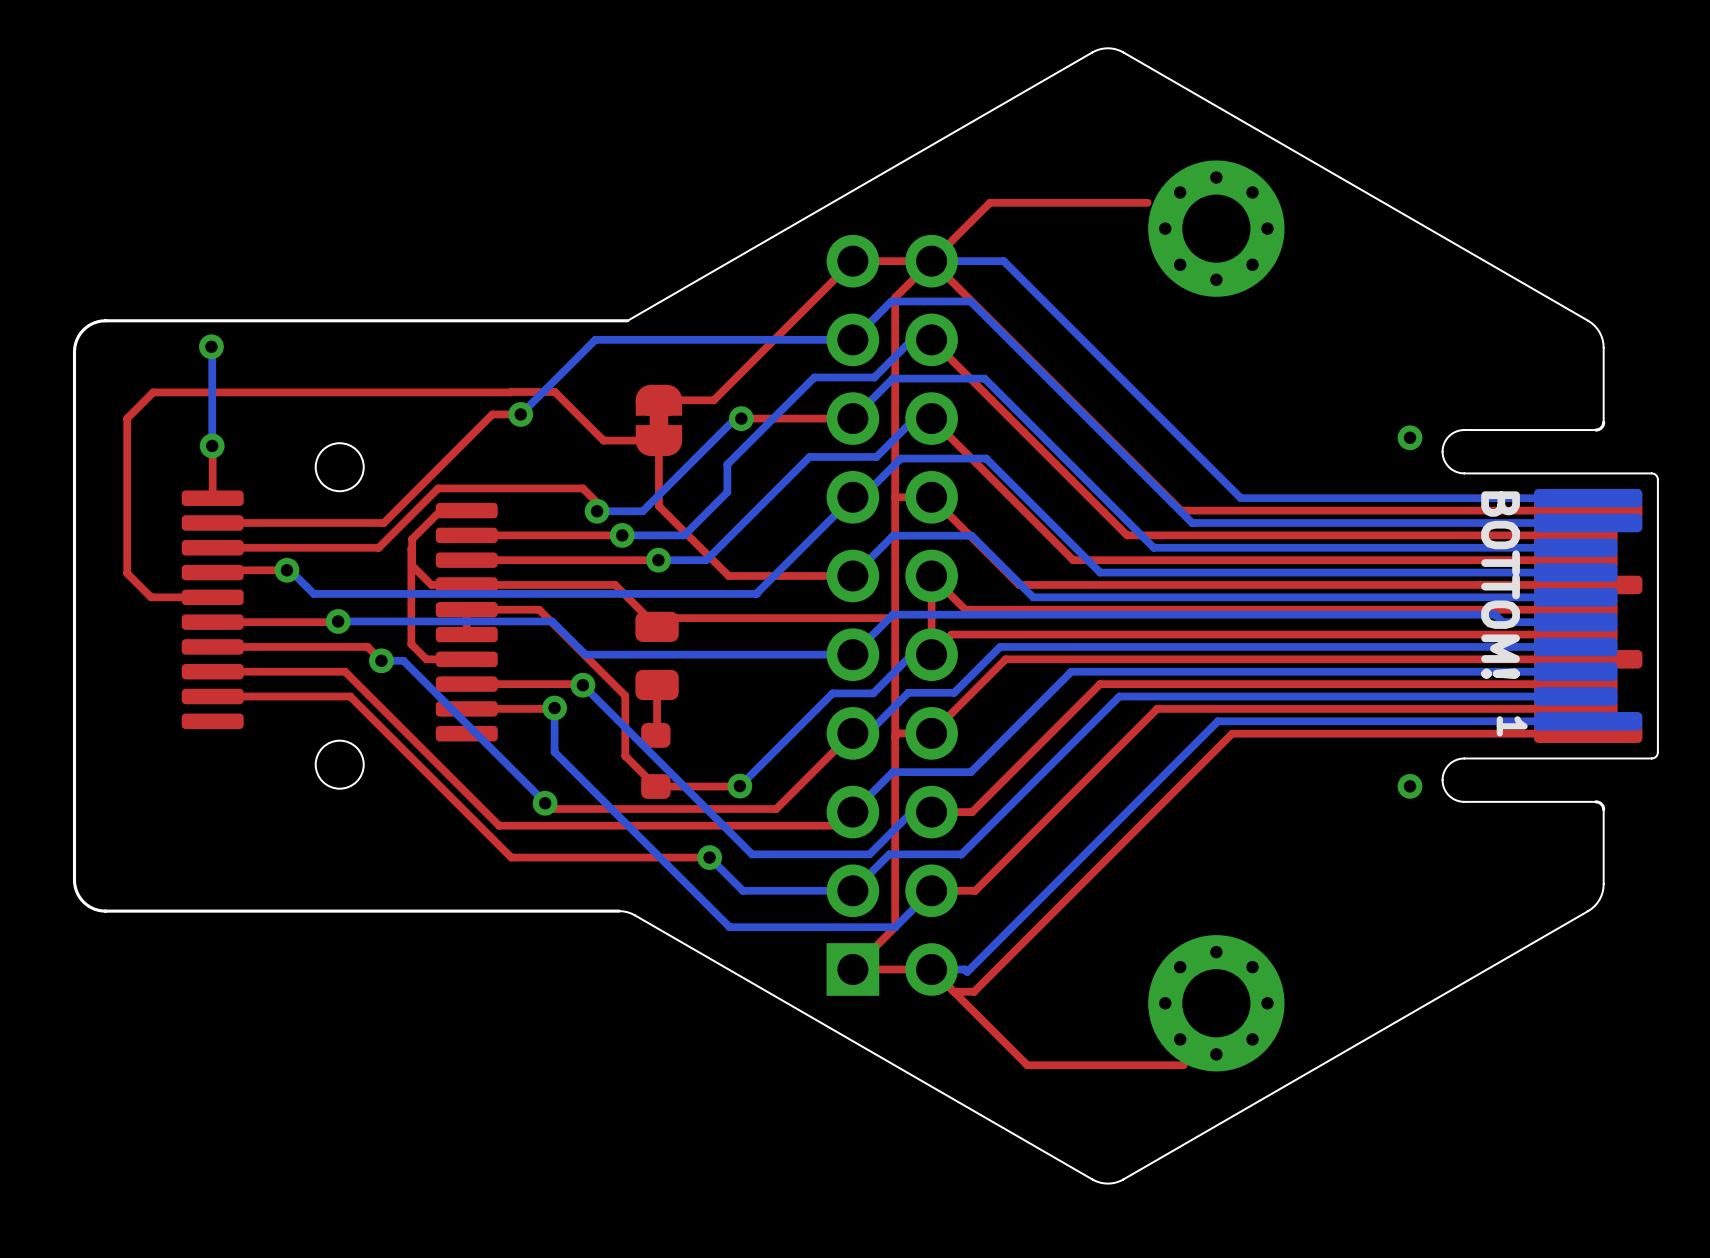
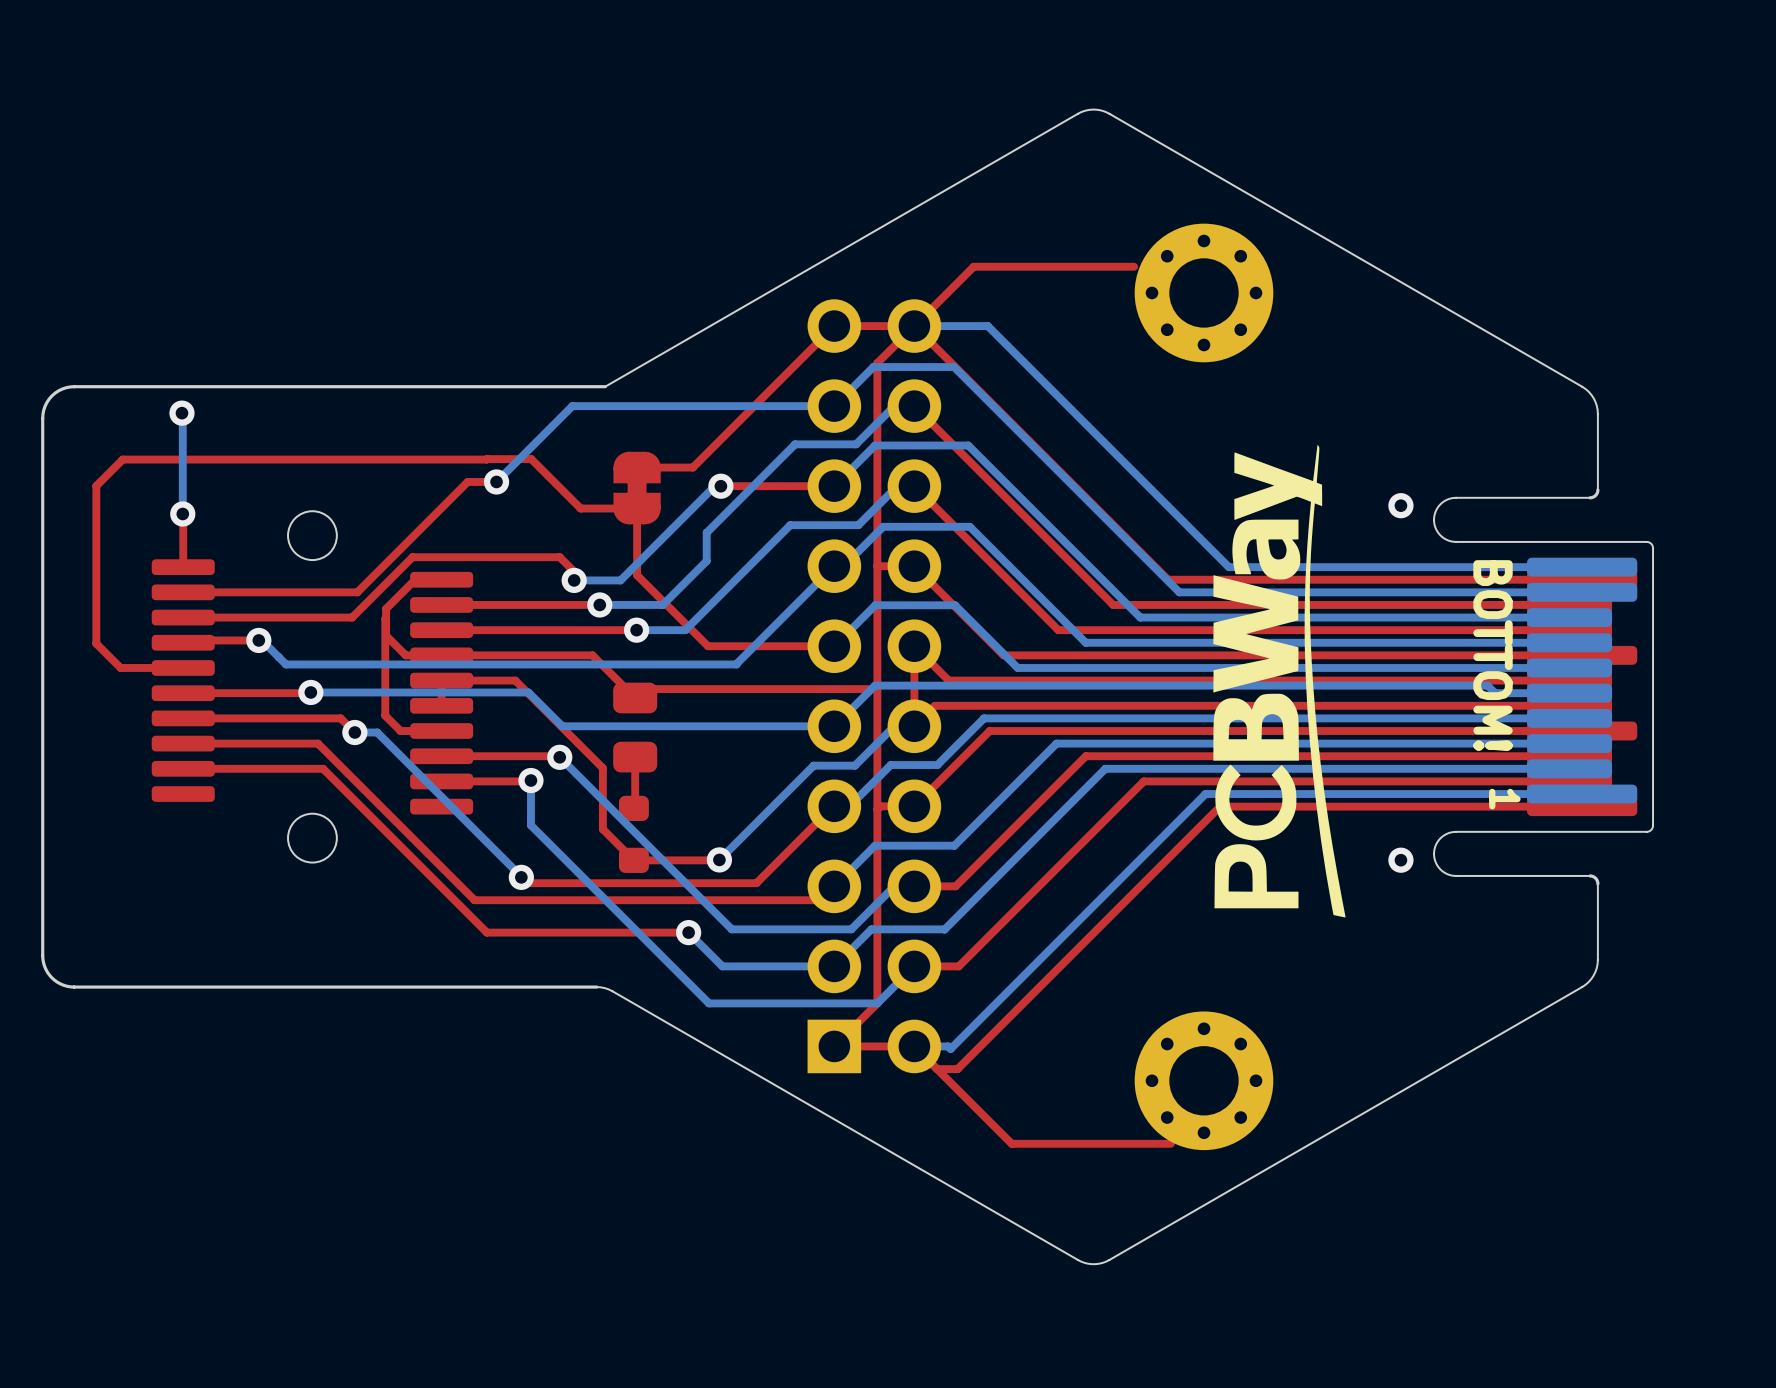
drawing: none -> [1213, 444, 1346, 918]

